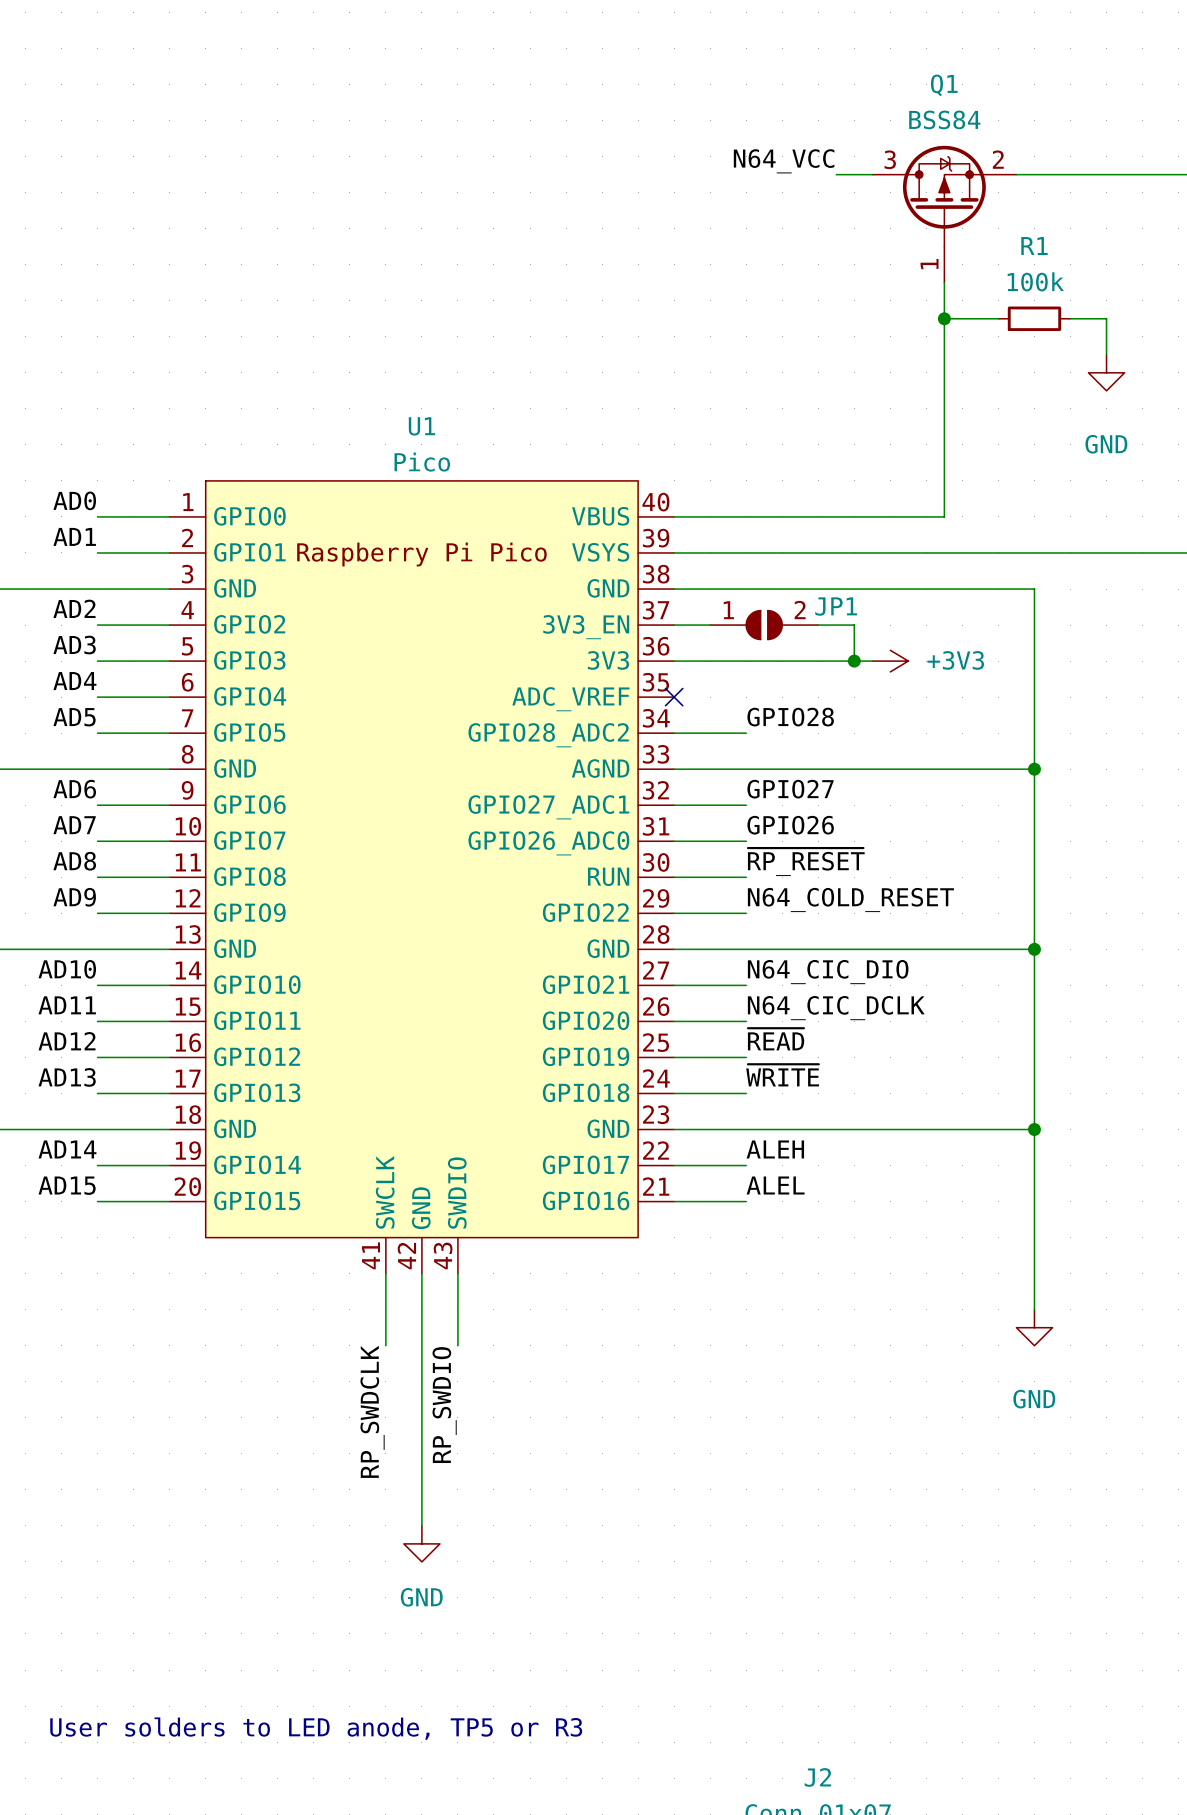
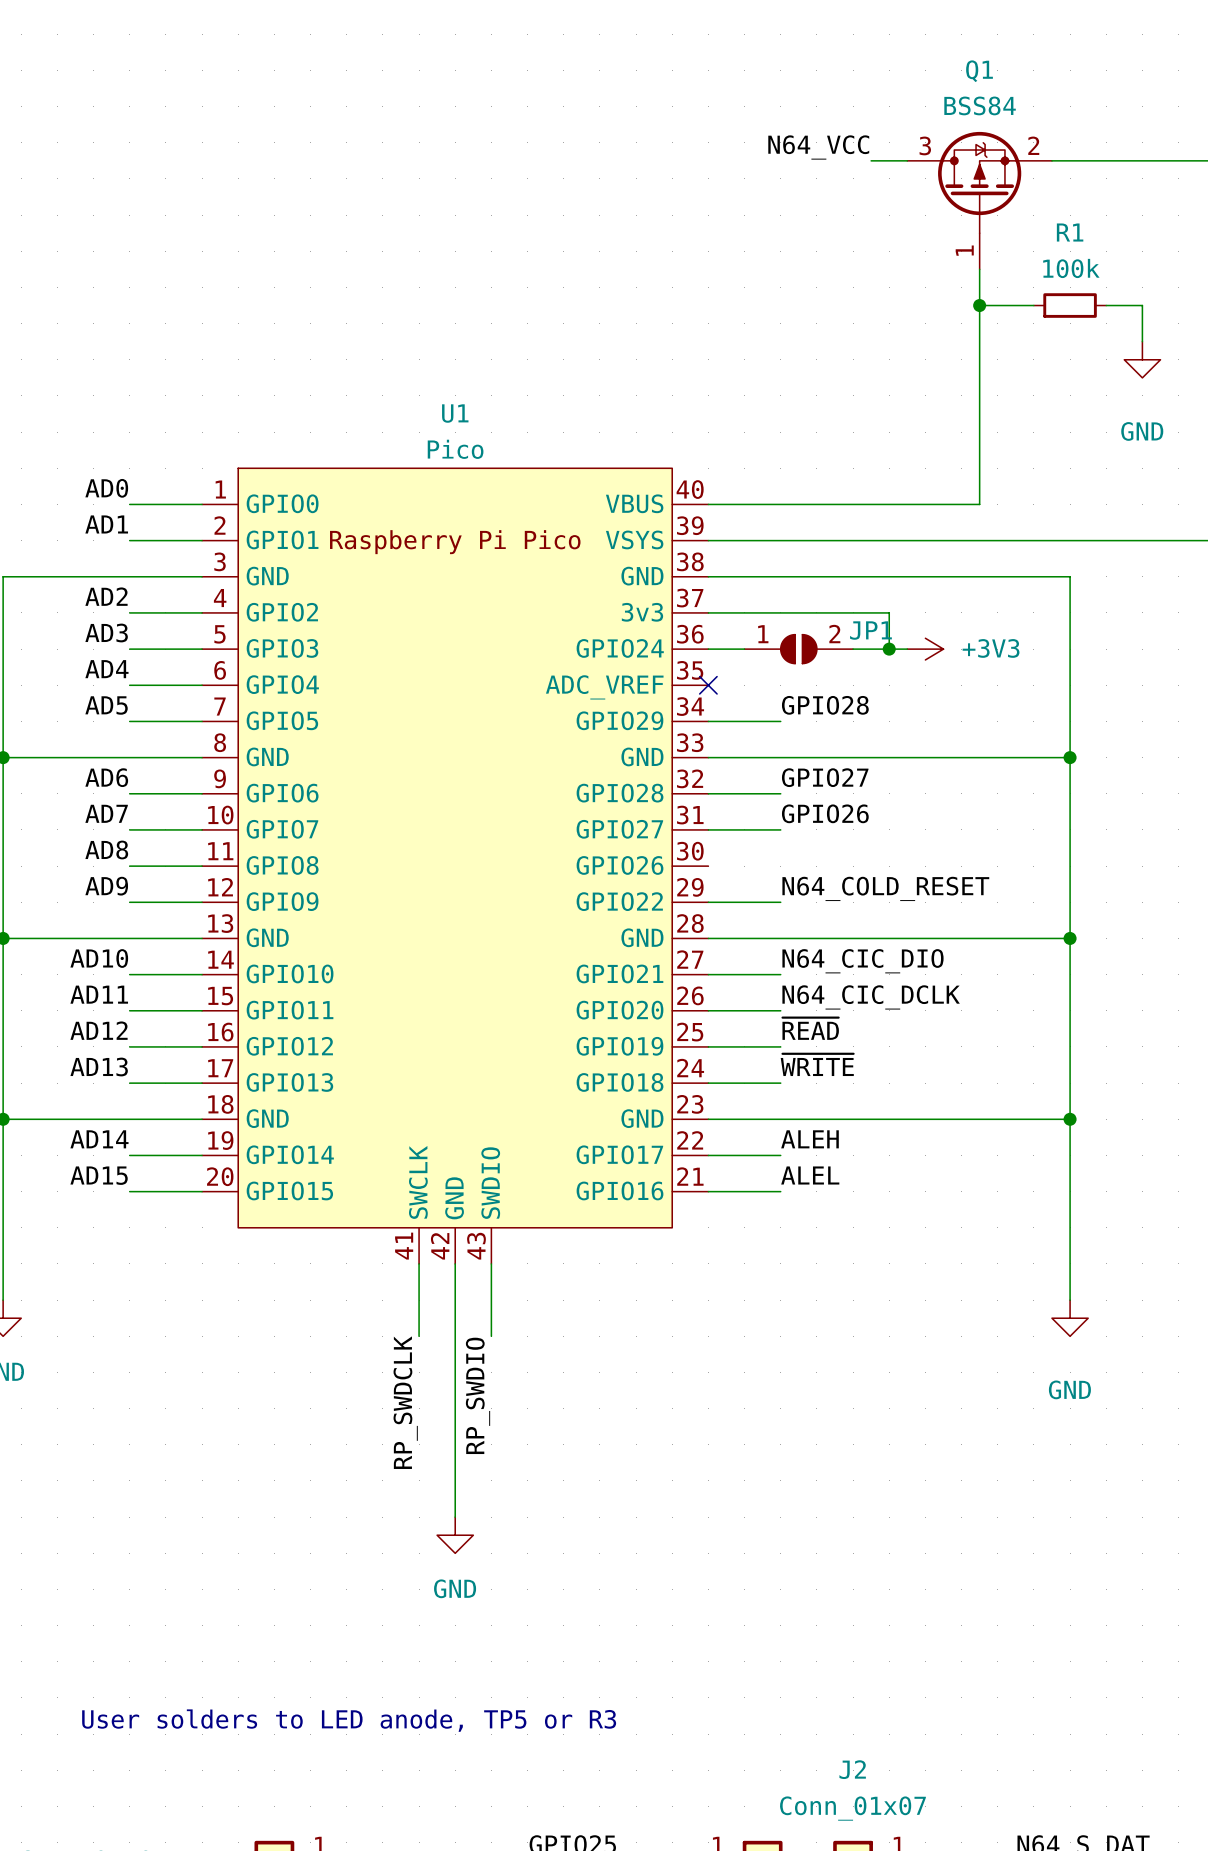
JP1 position: (764, 625) -> (798, 649)
U1 pin name: 3V3_EN (586, 627) -> 3v3 (642, 612)
U1 pin name: 3V3 (608, 660) -> GPIO24 (620, 648)
U1 pin name: GPIO28_ADC2 (548, 735) -> GPIO29 (619, 720)
U1 pin name: AGND (600, 768) -> GND (642, 756)
U1 pin name: GPIO27_ADC1 (548, 807) -> GPIO28 (620, 793)
U1 pin name: GPIO26_ADC0 (548, 843) -> GPIO27 (619, 829)
label: ~{RP_RESET} (806, 862) -> none
U1 pin name: RUN (608, 876) -> GPIO26 (620, 865)
wire: (674, 877) (746, 877) -> none

